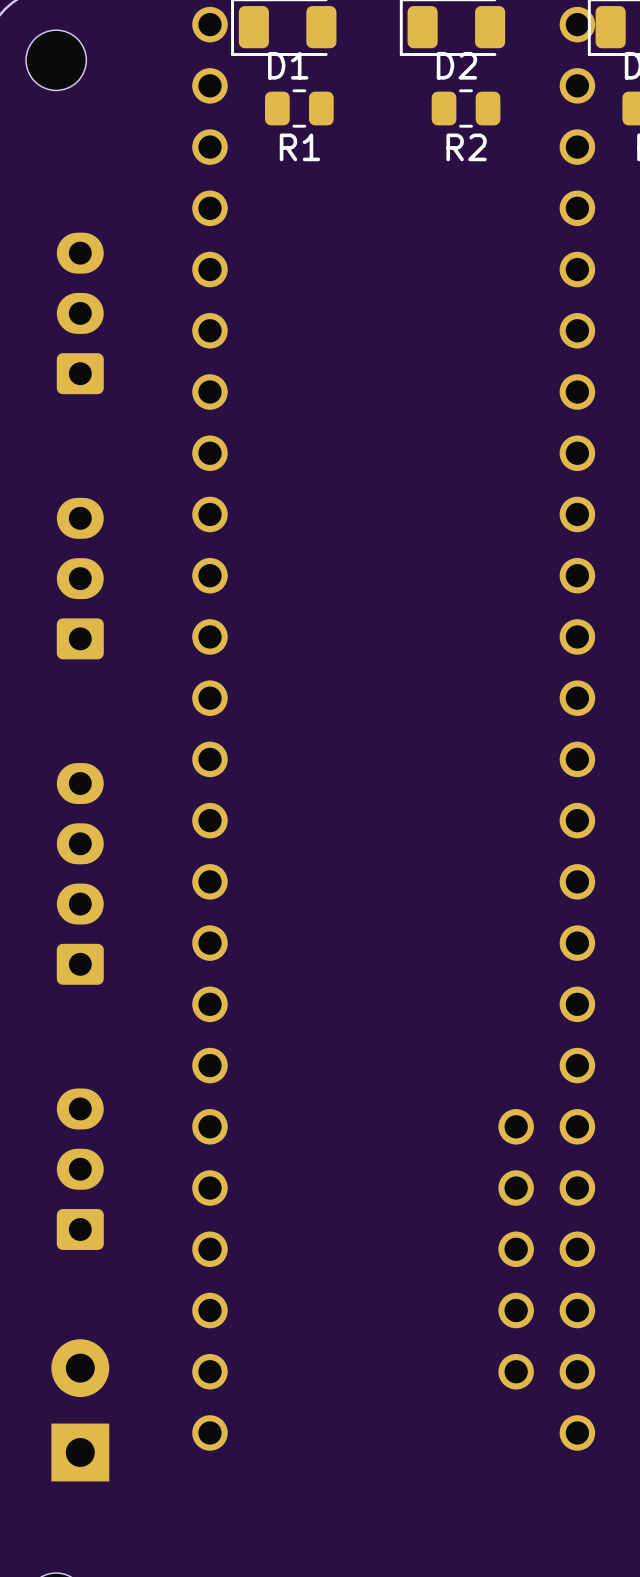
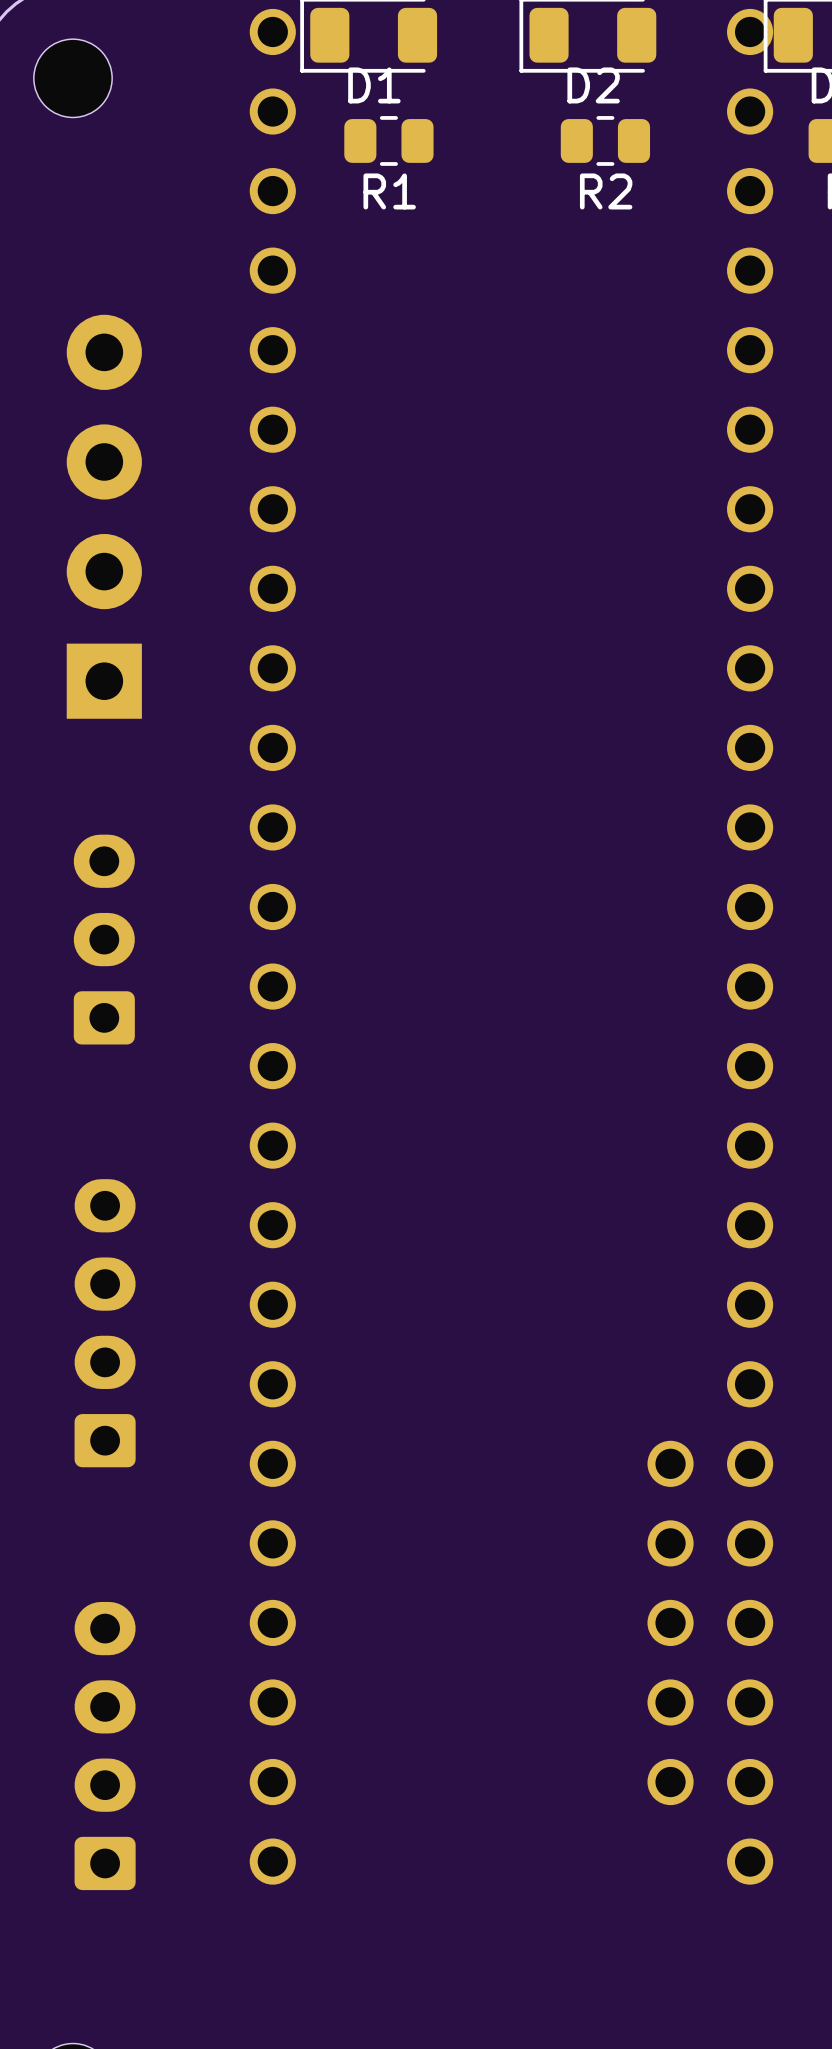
part: (80, 313) -> none
part: none -> (104, 516)
part position: (80, 578) -> (104, 939)
part position: (80, 873) -> (105, 1323)
part: (80, 1169) -> none
part: none -> (105, 1746)
part: (80, 1410) -> none

